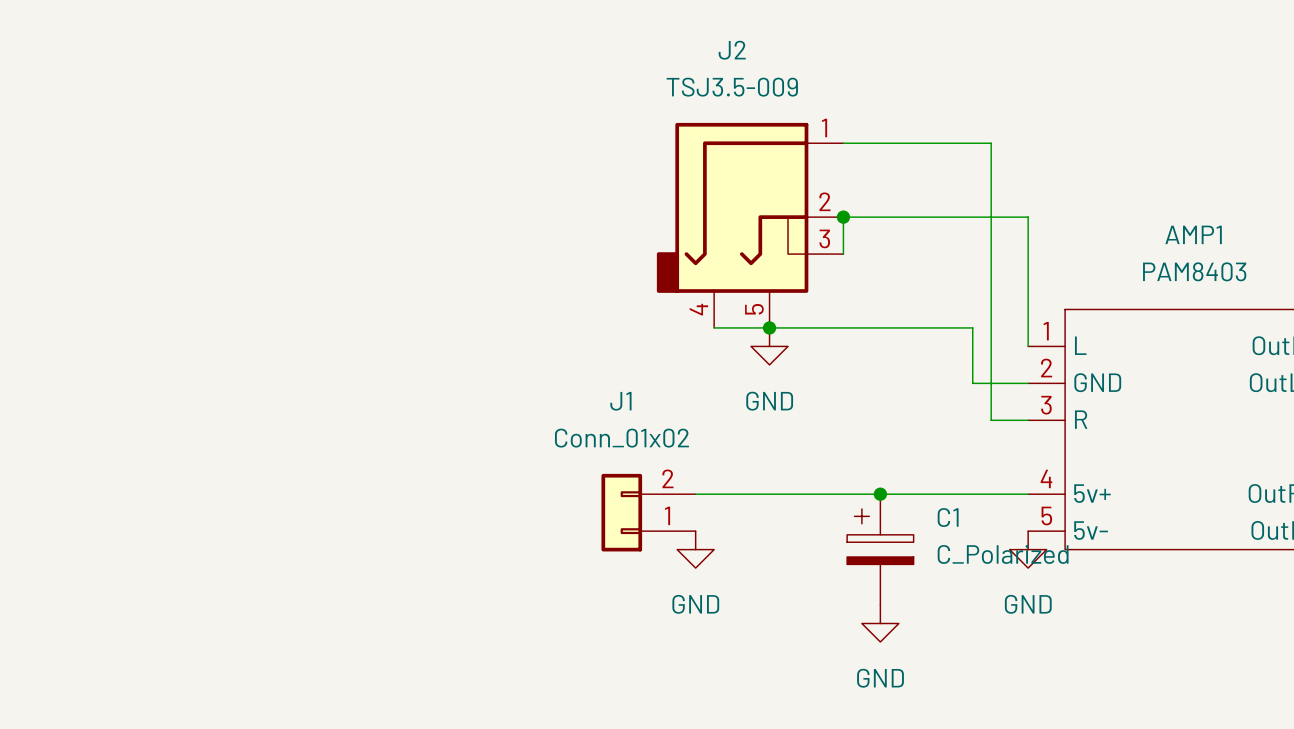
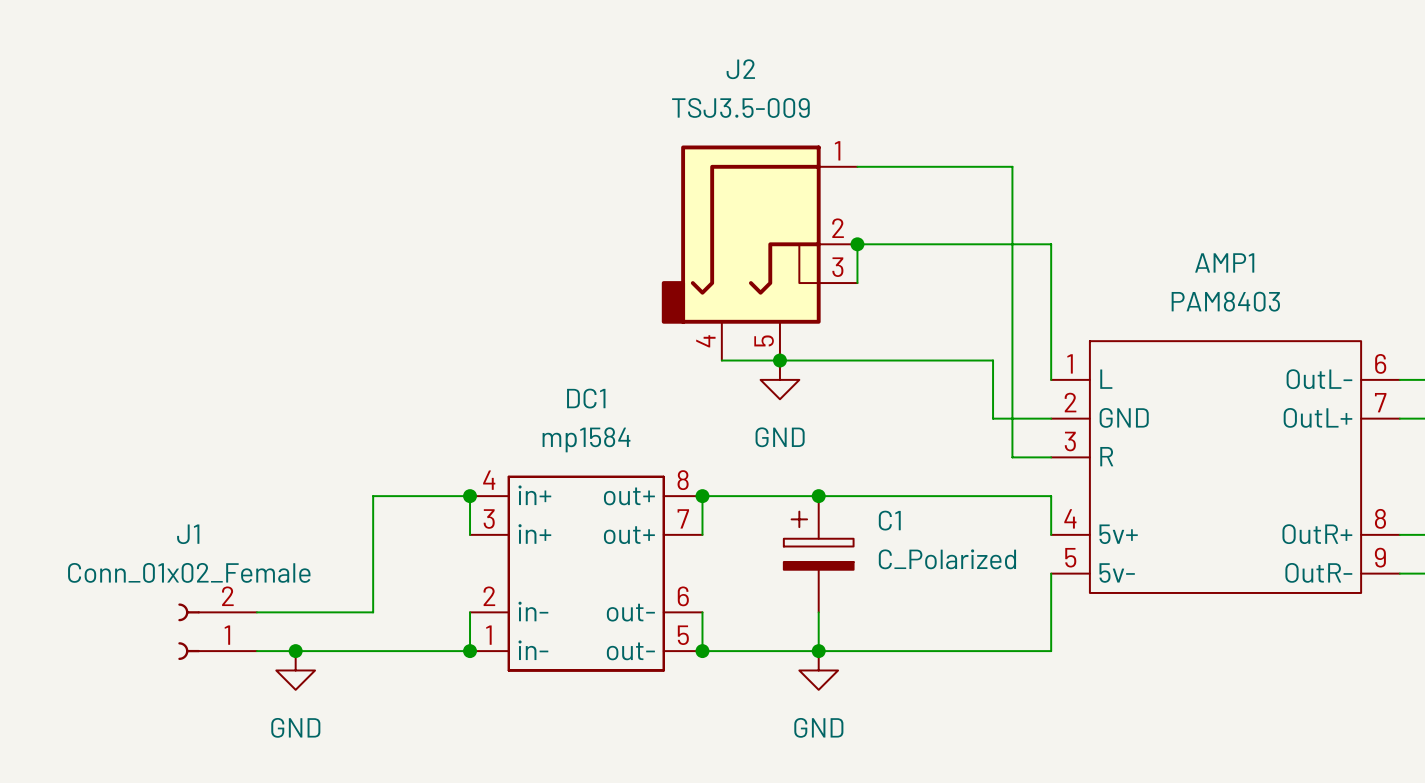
J1 value: Conn_01x02 (621, 438) -> Conn_01x02_Female (189, 572)
junction: none -> (470, 496)
junction: none -> (702, 496)
junction: none -> (818, 496)
J1 symbol: [601, 473, 696, 552] -> [178, 603, 257, 661]
wire: none -> (470, 534) (470, 496) (373, 496) (373, 612) (256, 612)
wire: (695, 494) (1028, 494) -> (702, 534) (702, 496) (1051, 496) (1051, 534)
junction: (880, 494) -> none
DC1: none -> mp1584 (586, 573)
wire: none -> (1051, 573) (1051, 651) (702, 651) (702, 612)
power symbol: GND (695, 549) -> none
C1 position: (880, 549) -> (818, 554)
power symbol: GND (1028, 549) -> none
wire: none -> (470, 612) (470, 651) (256, 651)
wire: none -> (818, 612) (818, 651)
junction: none -> (295, 651)
junction: none -> (470, 651)
junction: none -> (702, 651)
junction: none -> (818, 651)
power symbol: none -> GND (295, 670)
power symbol: none -> GND (818, 670)
power symbol: GND (880, 623) -> none

